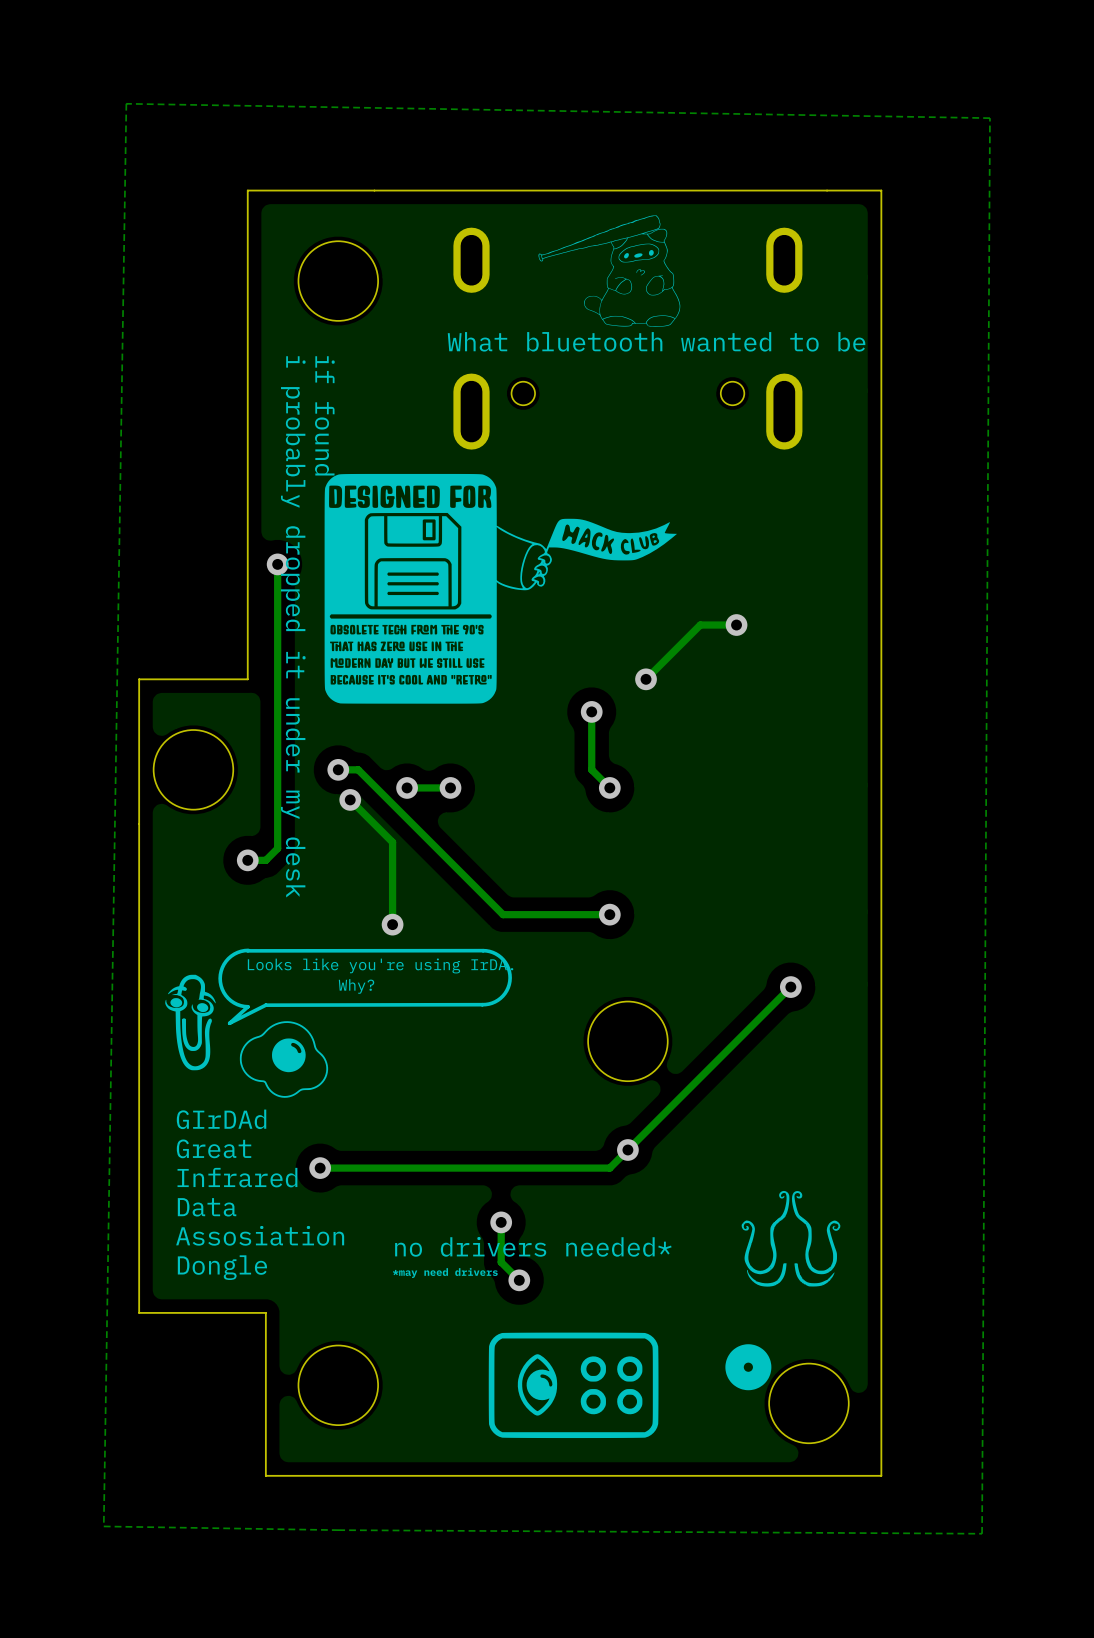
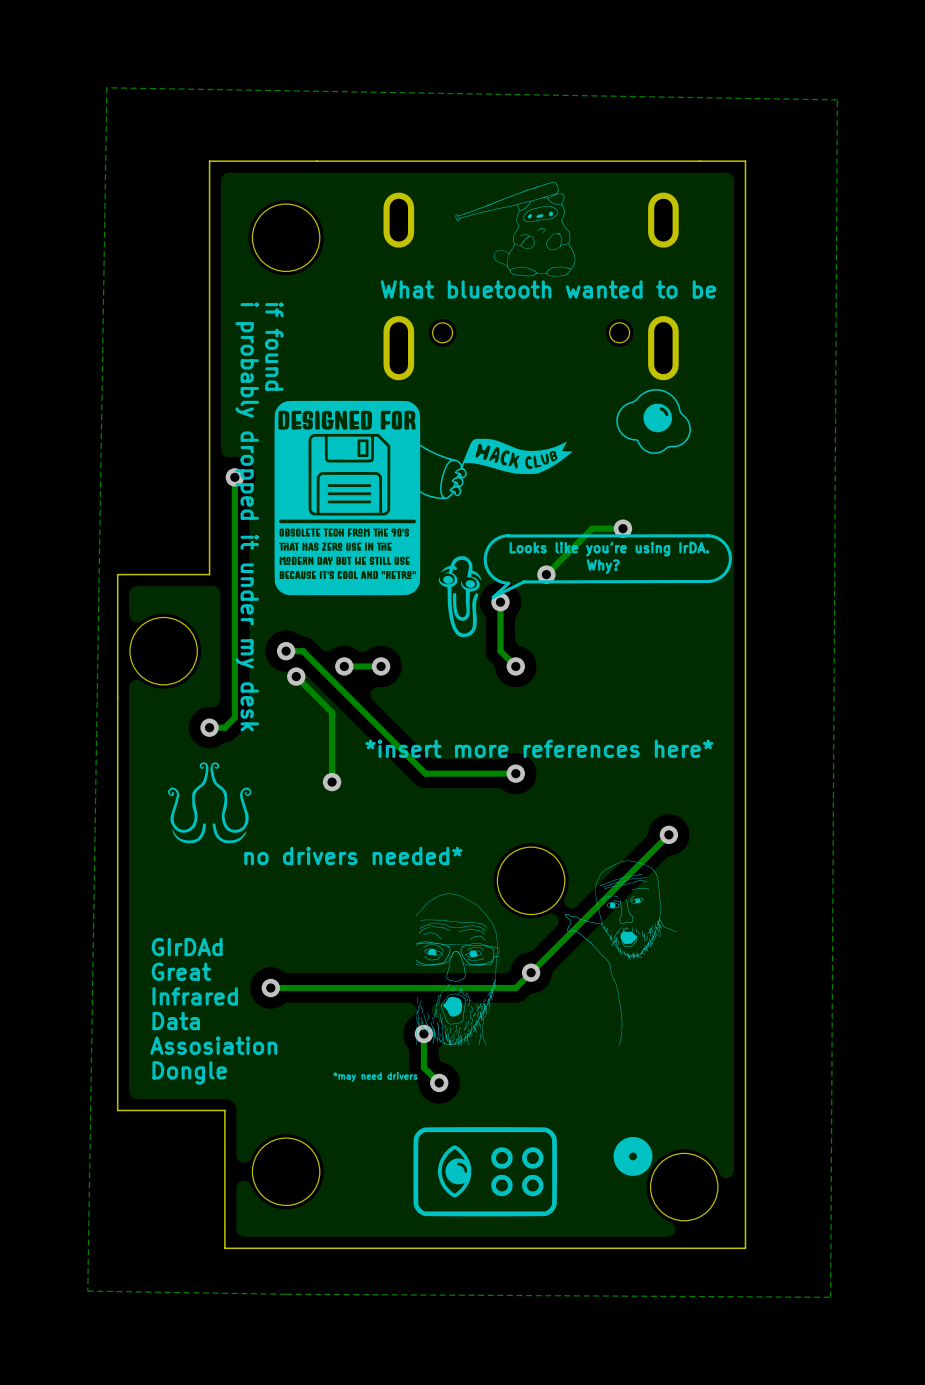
text: none -> *insert more references here* (539, 748)
line: (248, 950) (231, 956) (221, 971) (221, 985) (225, 995) (234, 1002) (247, 1006) (229, 1023) (265, 1005) (485, 1004) (495, 1001) (502, 996) (509, 981) (509, 971) (505, 962) (495, 953) (486, 950) (247, 950) -> (509, 535) (494, 540) (486, 553) (485, 565) (489, 573) (499, 581) (508, 583) (493, 597) (523, 581) (709, 581) (717, 579) (724, 574) (730, 561) (729, 553) (724, 543) (718, 538) (710, 535) (508, 535)
text position: Looks like you're using IrDA. (380, 965) -> Looks like you're using IrDA. (609, 549)
text position: Why? (356, 986) -> Why? (603, 566)
drawing: none -> [416, 860, 677, 1046]
drawing position: (190, 1022) -> (460, 596)
drawing position: (283, 1059) -> (653, 421)
drawing position: (791, 1238) -> (209, 802)
text position: no drivers needed* (533, 1246) -> no drivers needed* (353, 855)

